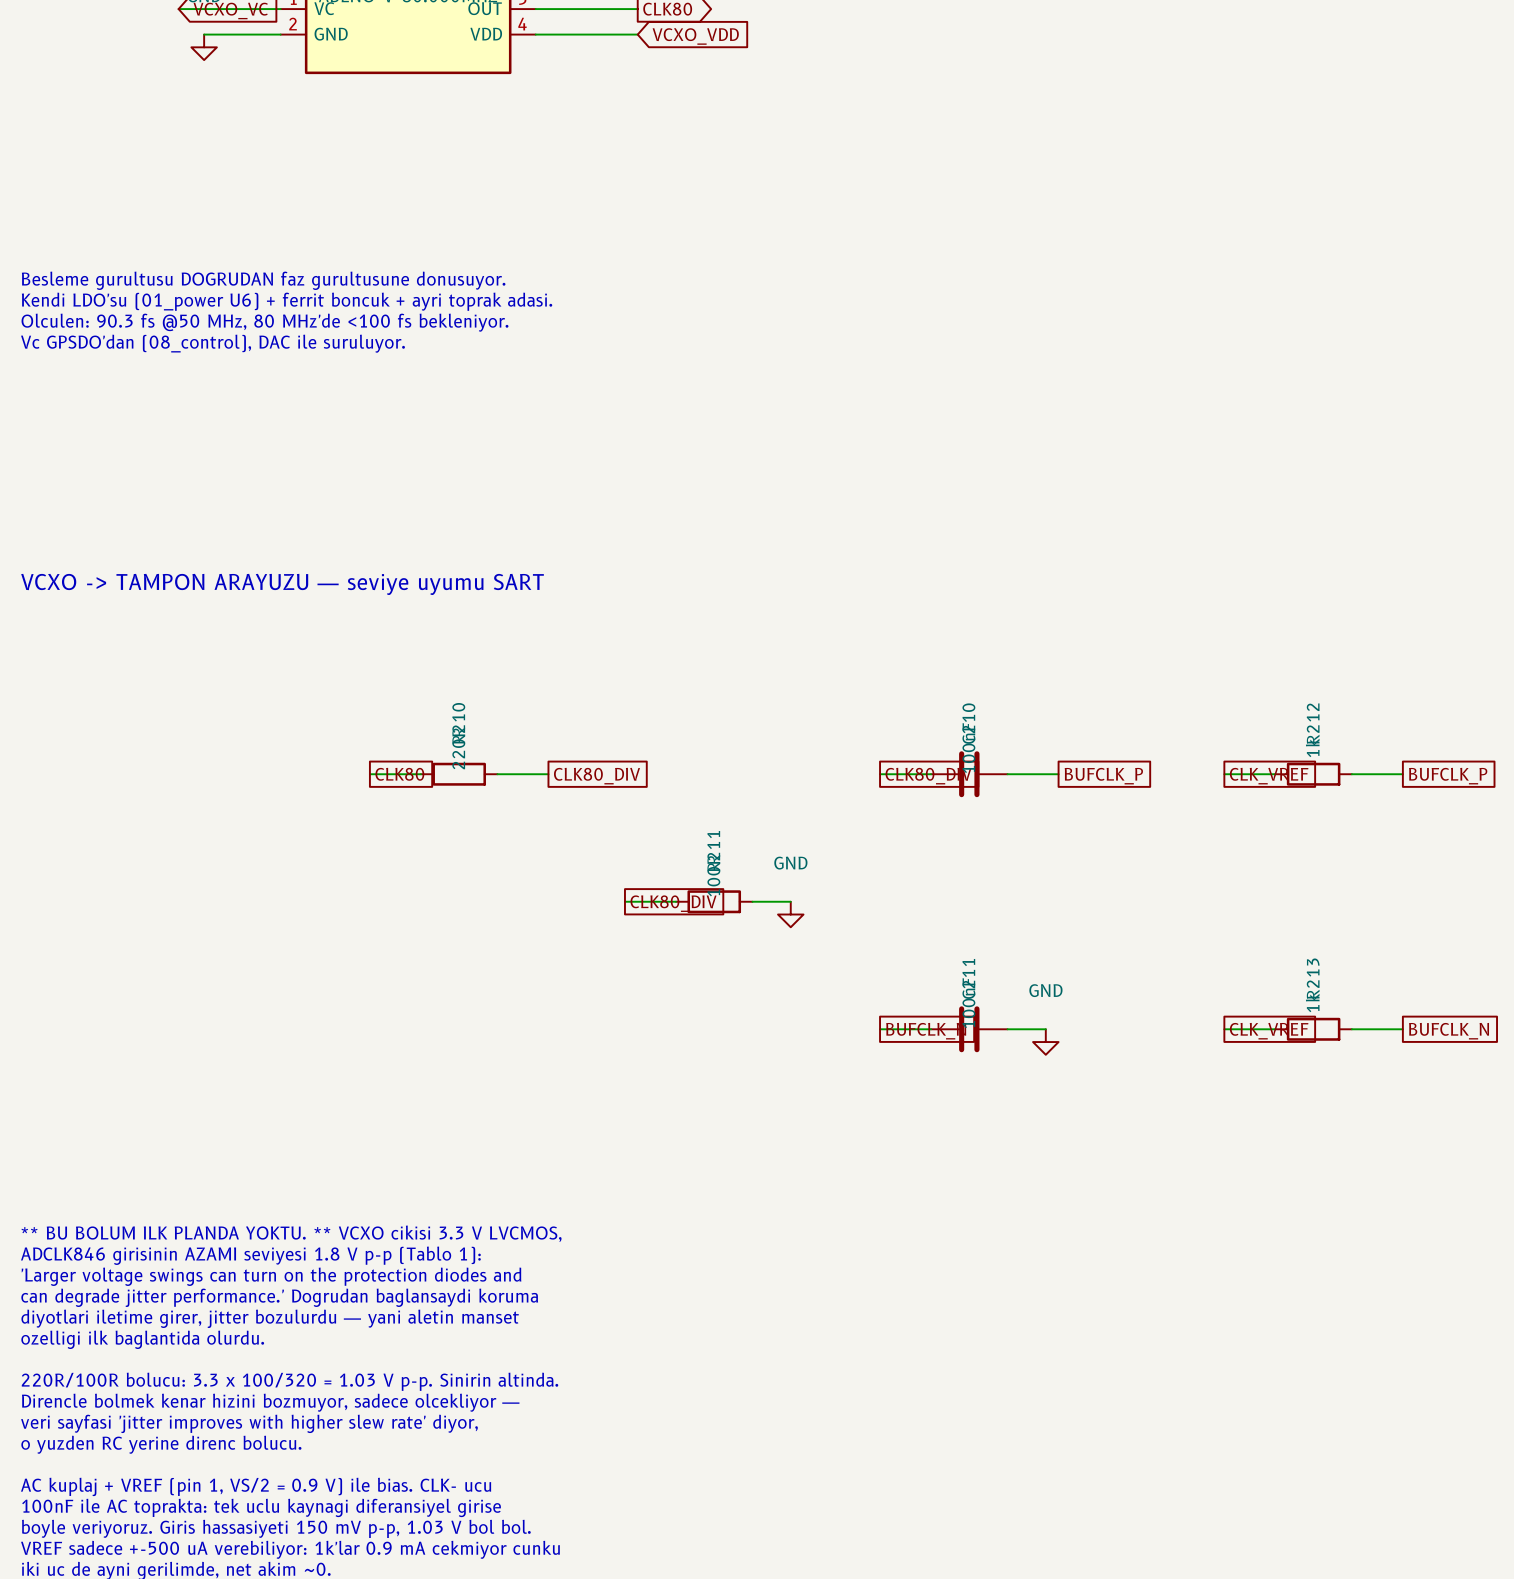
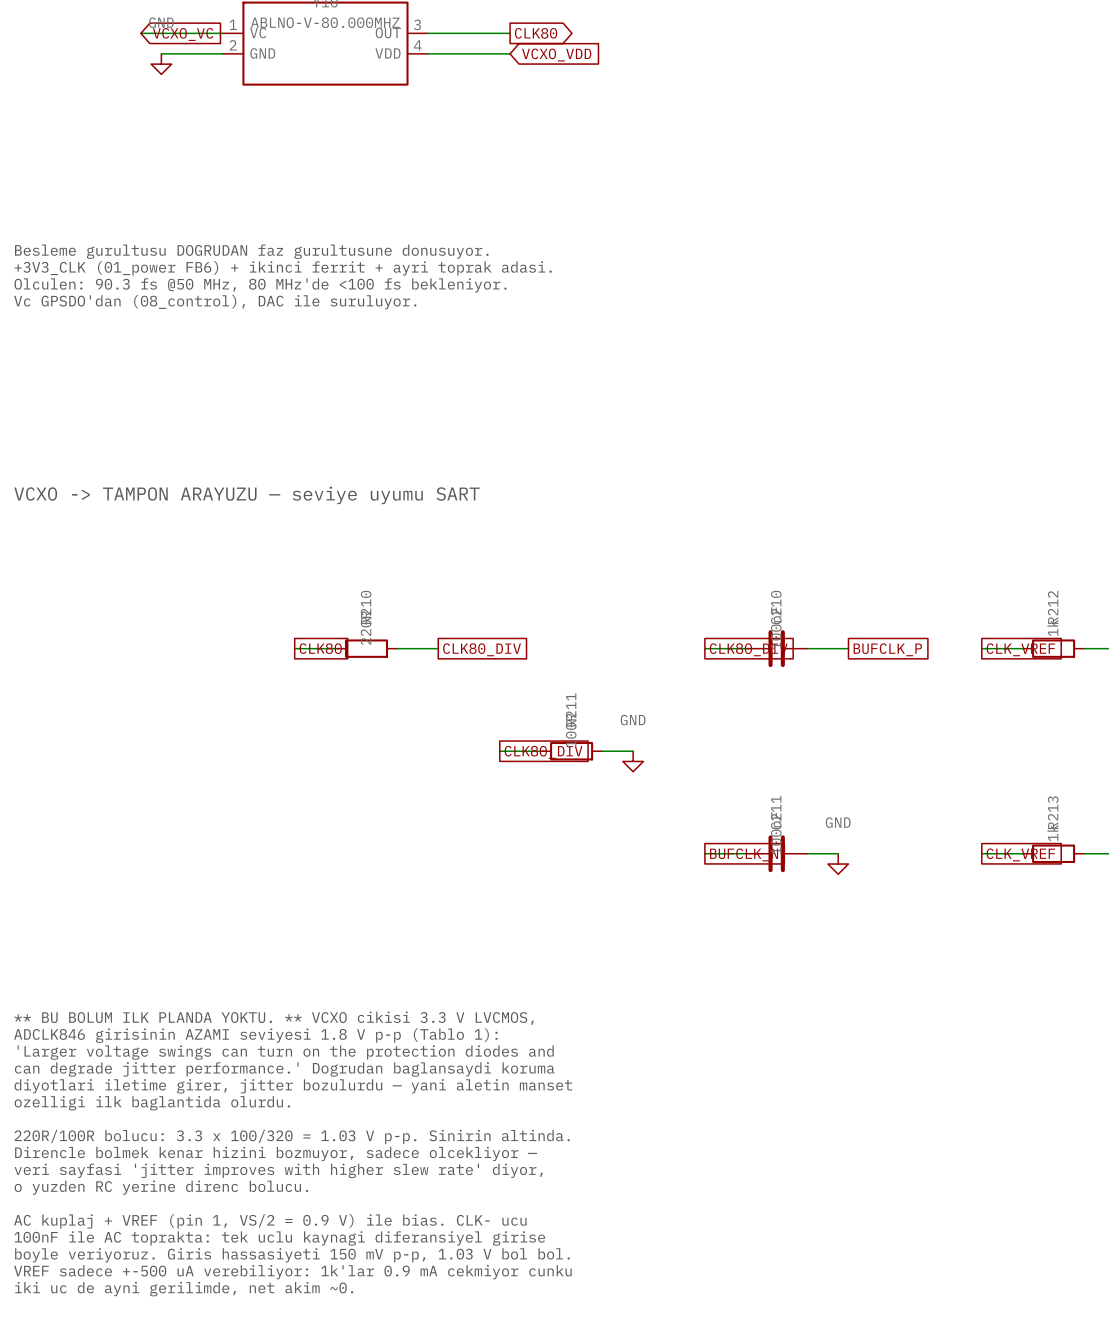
text: Kendi LDO'su (01_power U6) + ferrit boncuk + ayri toprak adasi. (287, 301) -> +3V3_CLK (01_power FB6) + ikinci ferrit + ayri toprak adasi. (283, 268)

